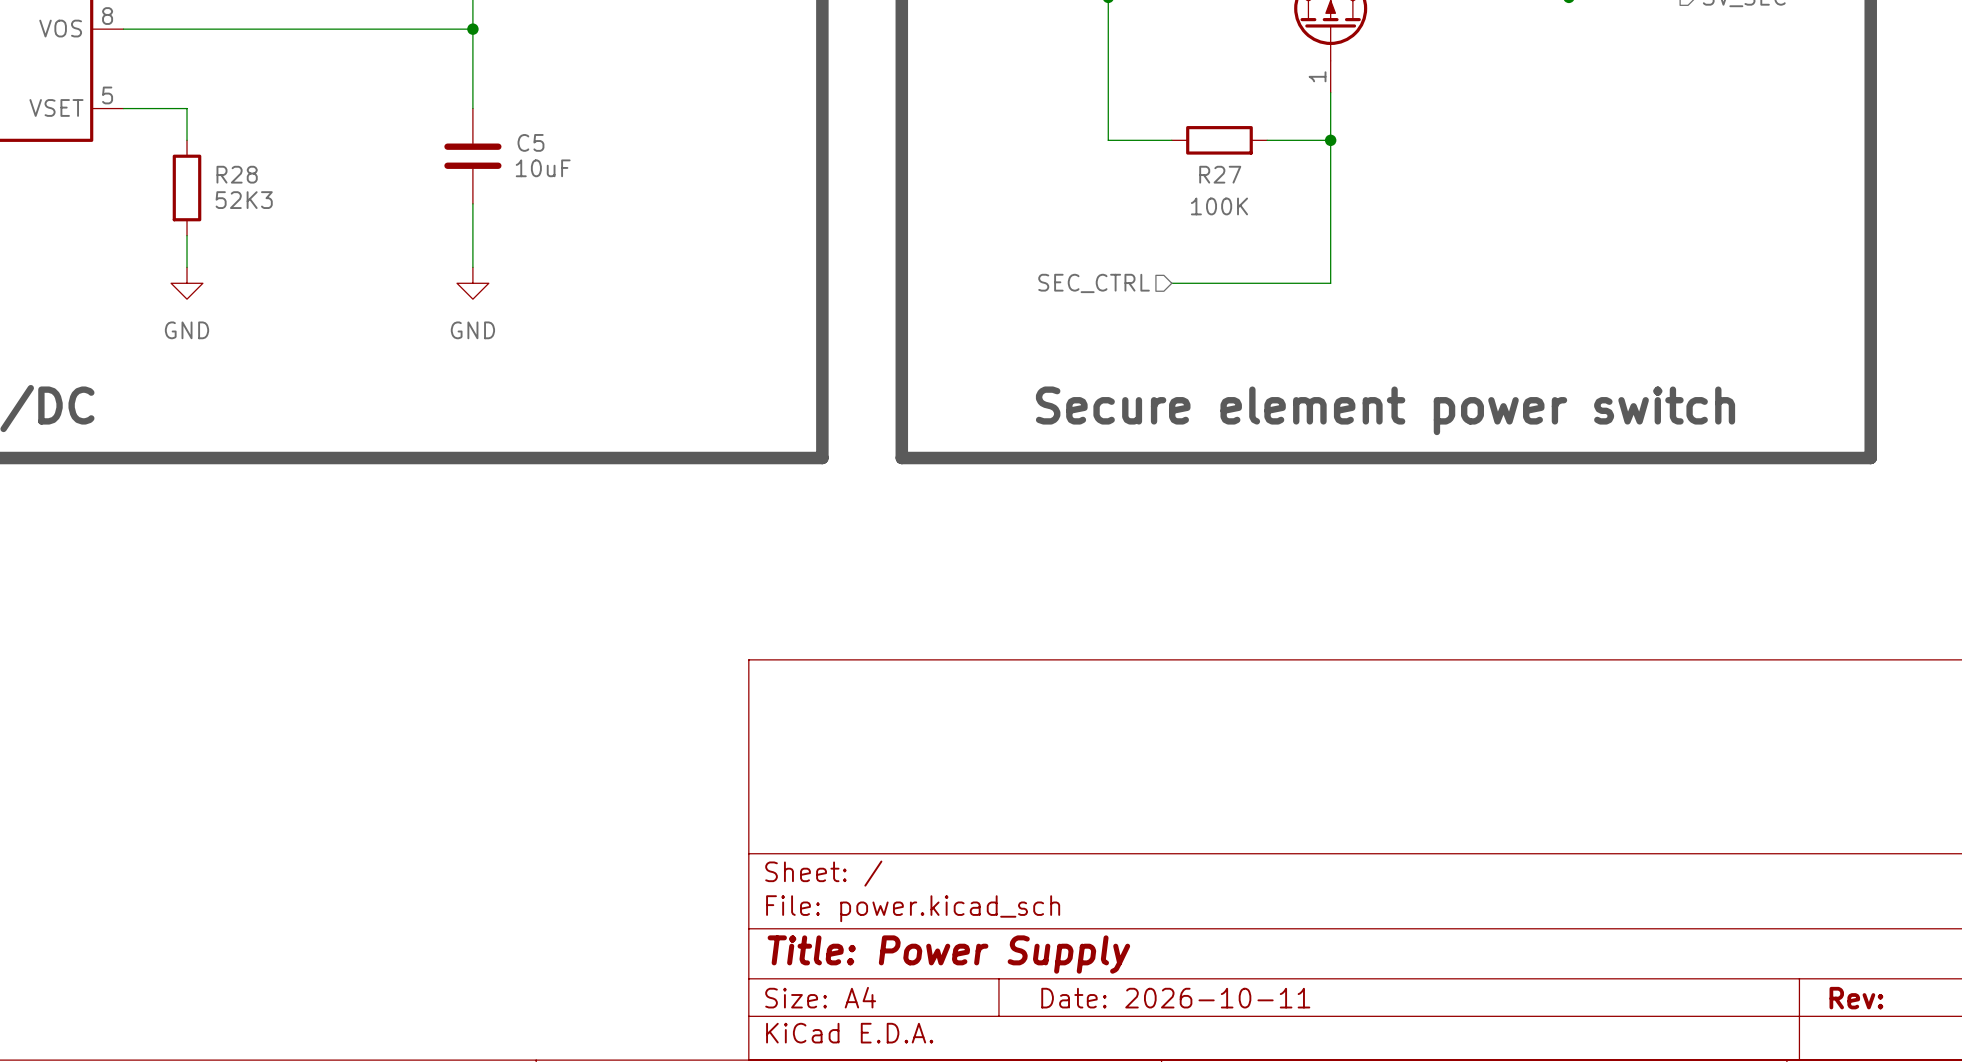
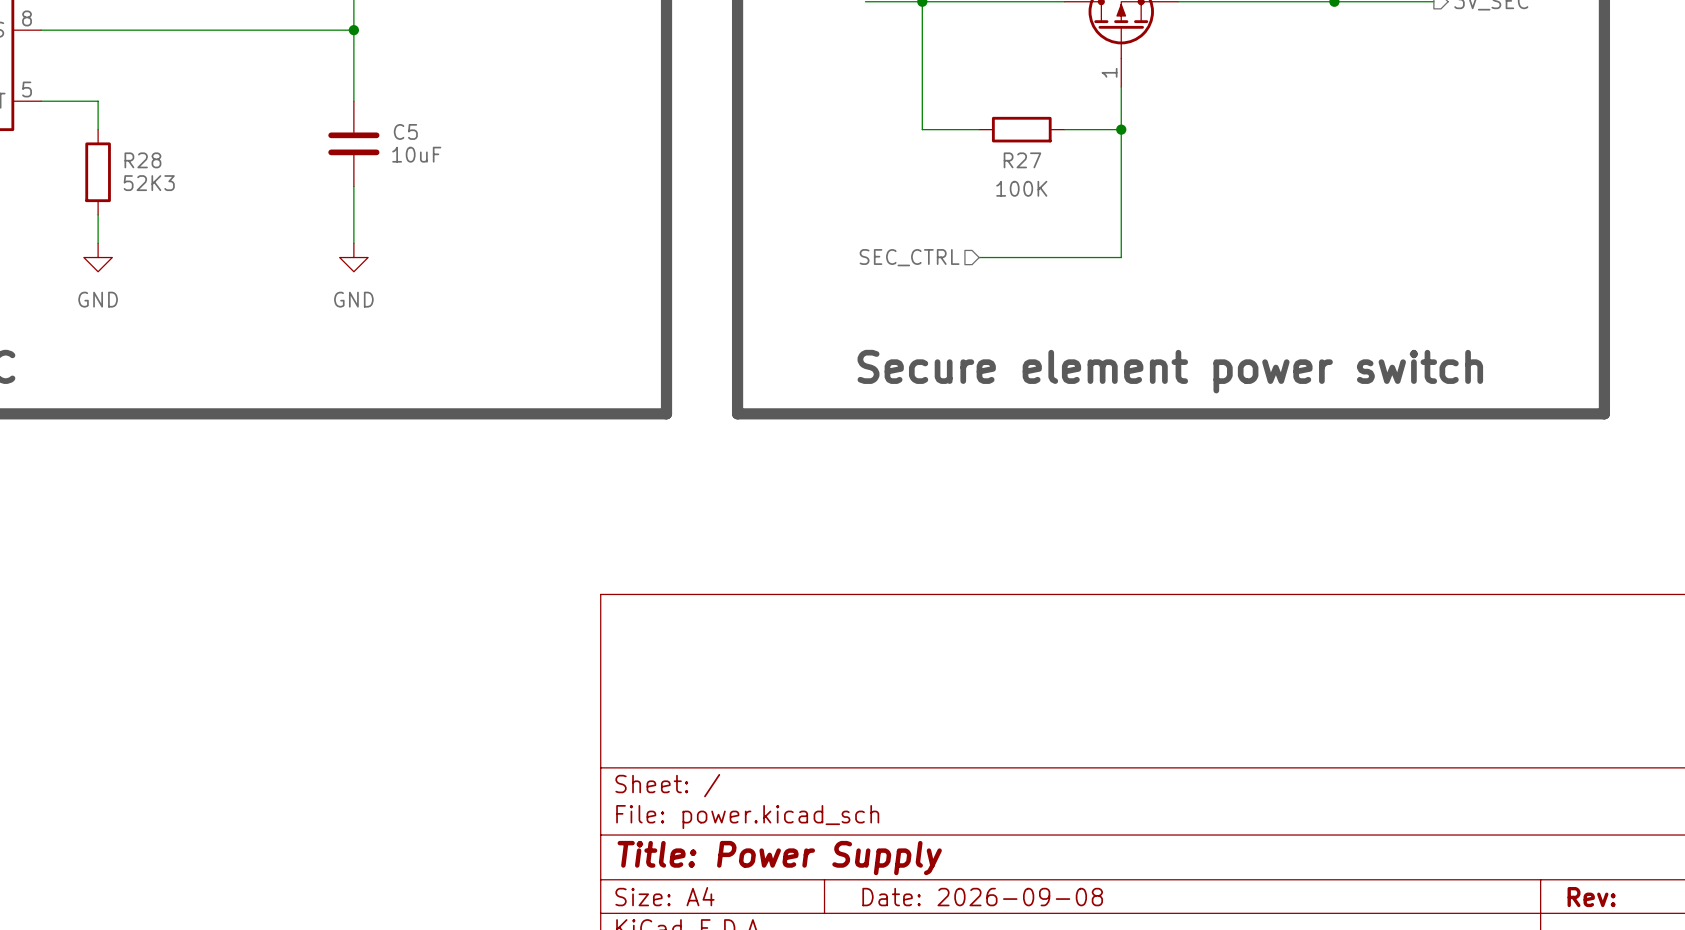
title block: Date: 2026-10-11 (1175, 998) -> Date: 2026-09-08 (982, 897)

